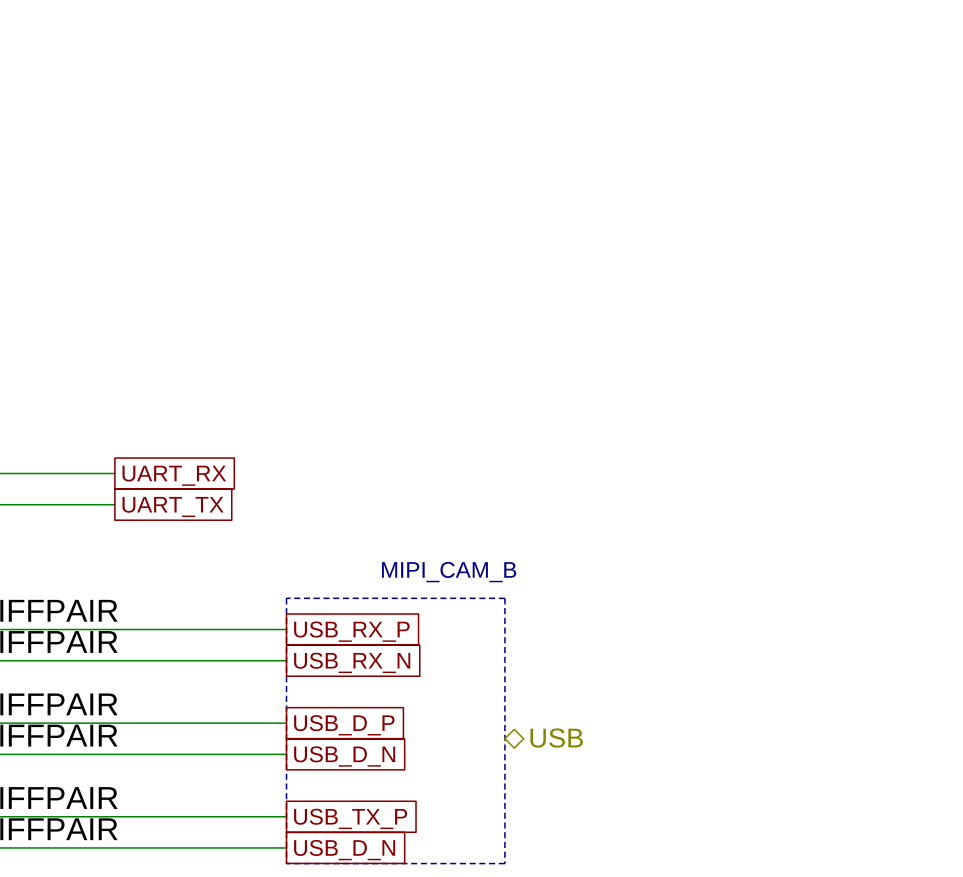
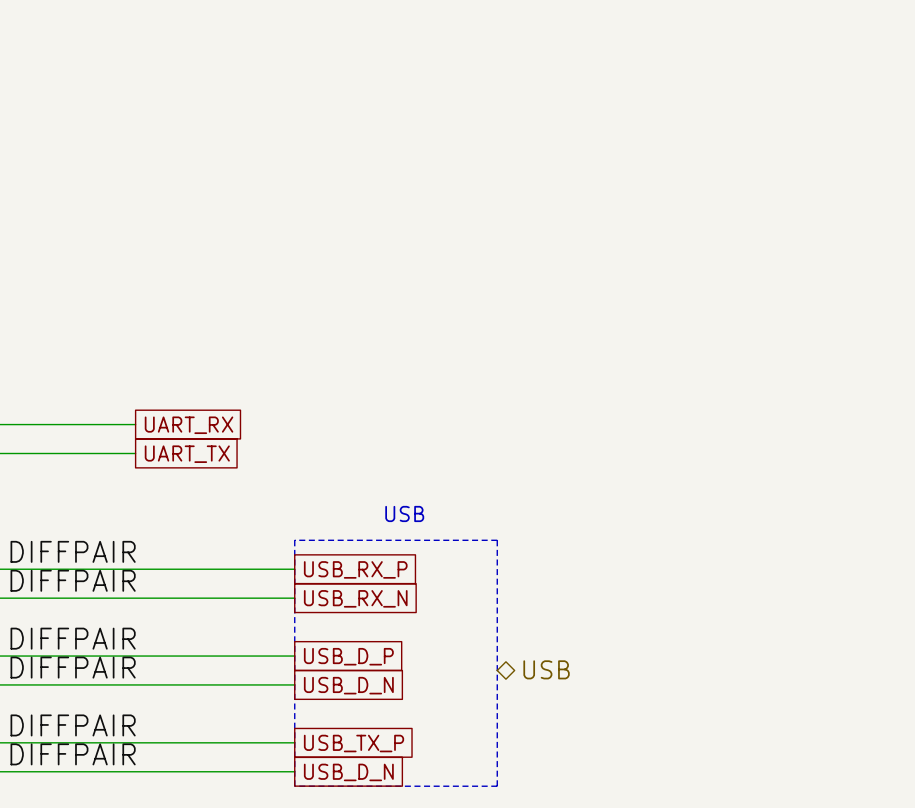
text: MIPI_CAM_B (449, 572) -> USB (404, 513)

